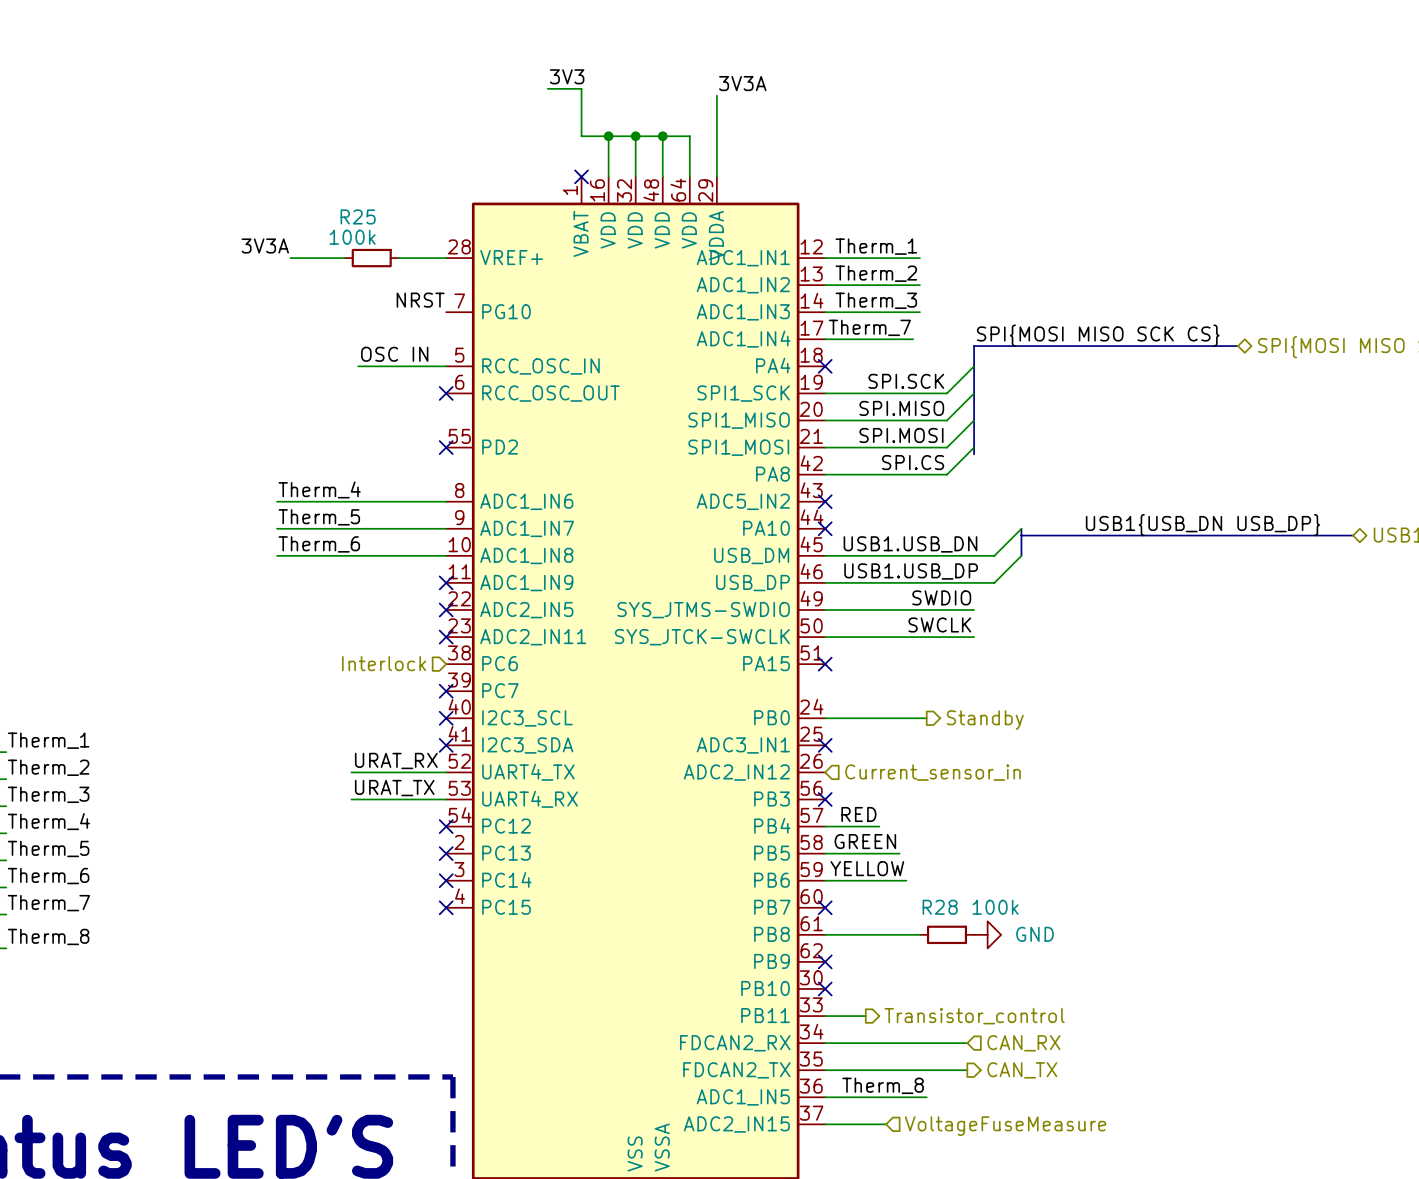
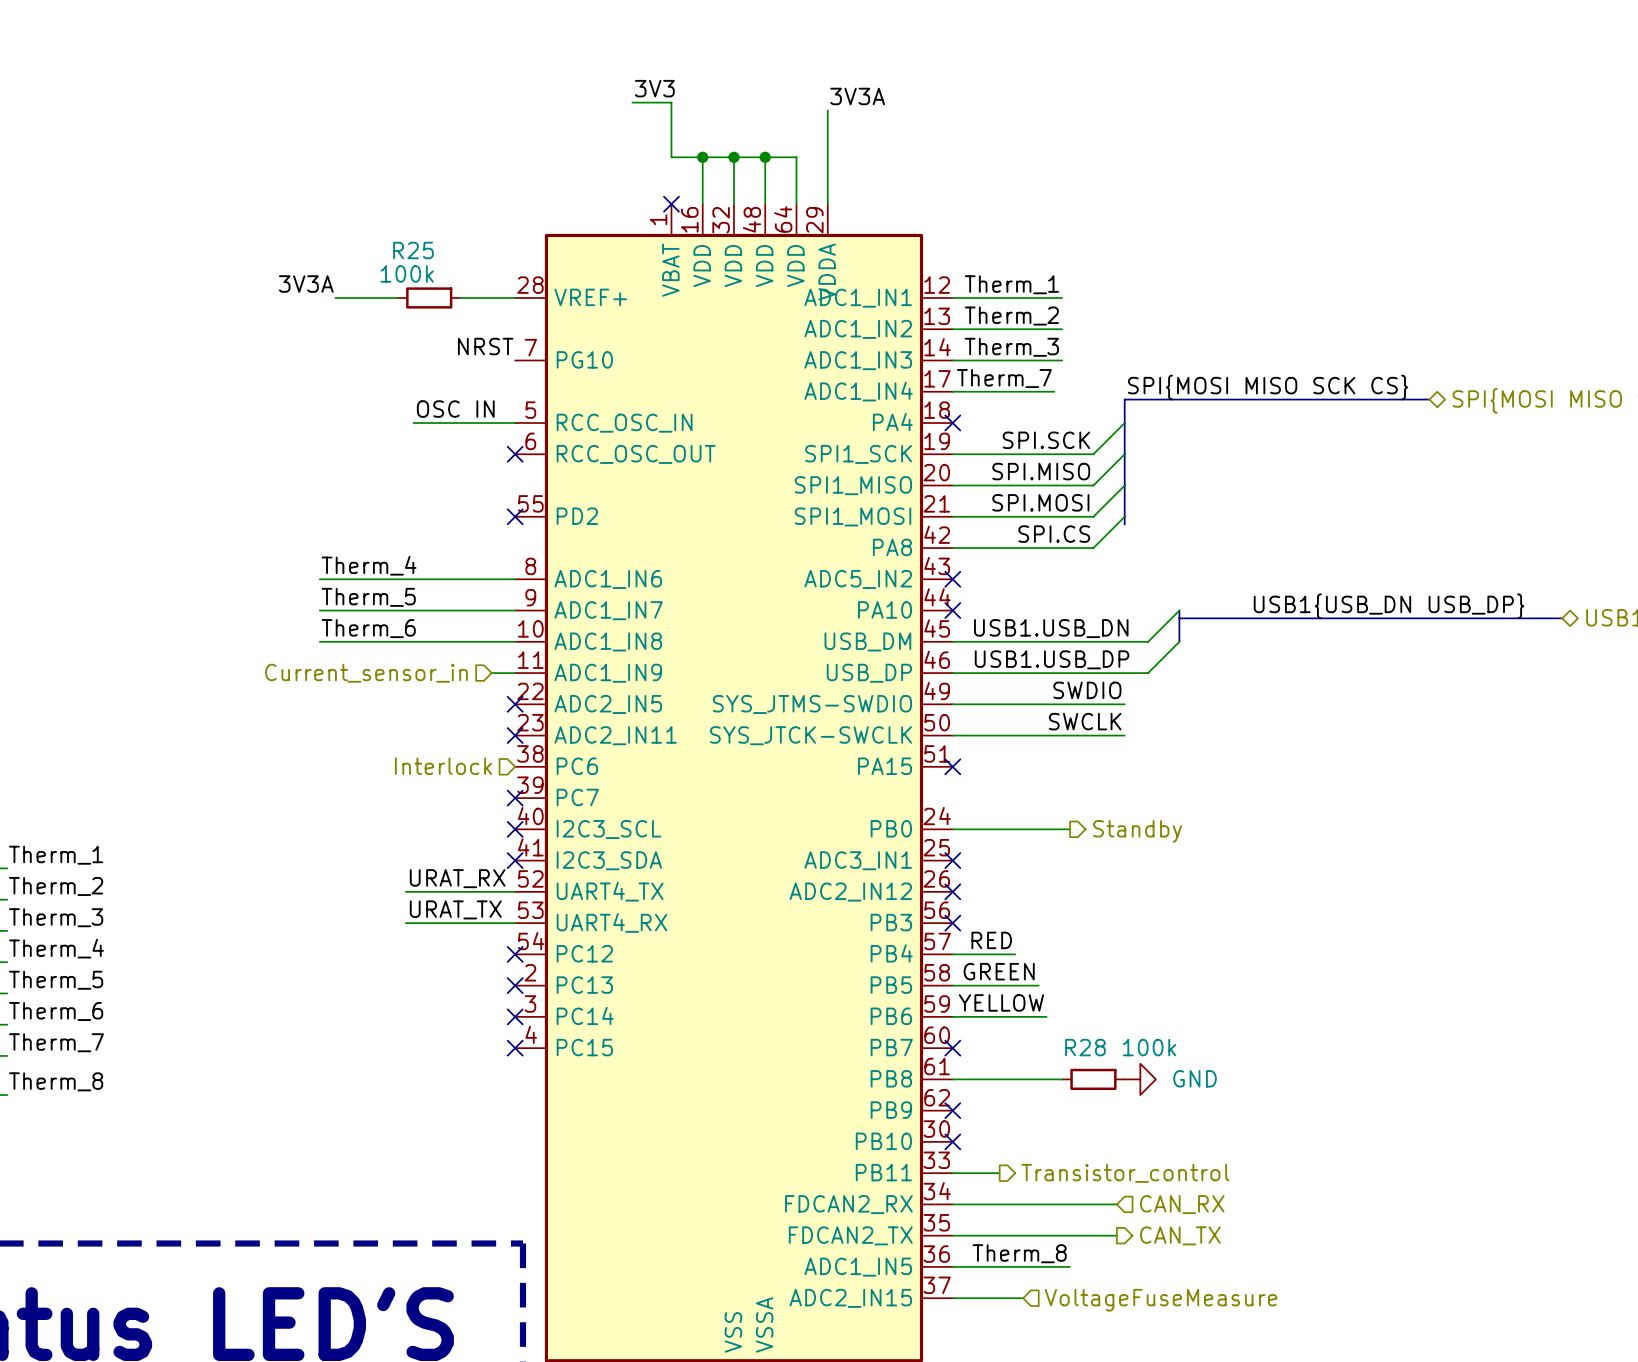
wire: none -> (491, 673) (515, 673)
no-connect mark: (446, 582) -> none
hierarchical label: none -> Current_sensor_in (366, 673)
no-connect mark: none -> (952, 891)
hierarchical label: Current_sensor_in (933, 772) -> none

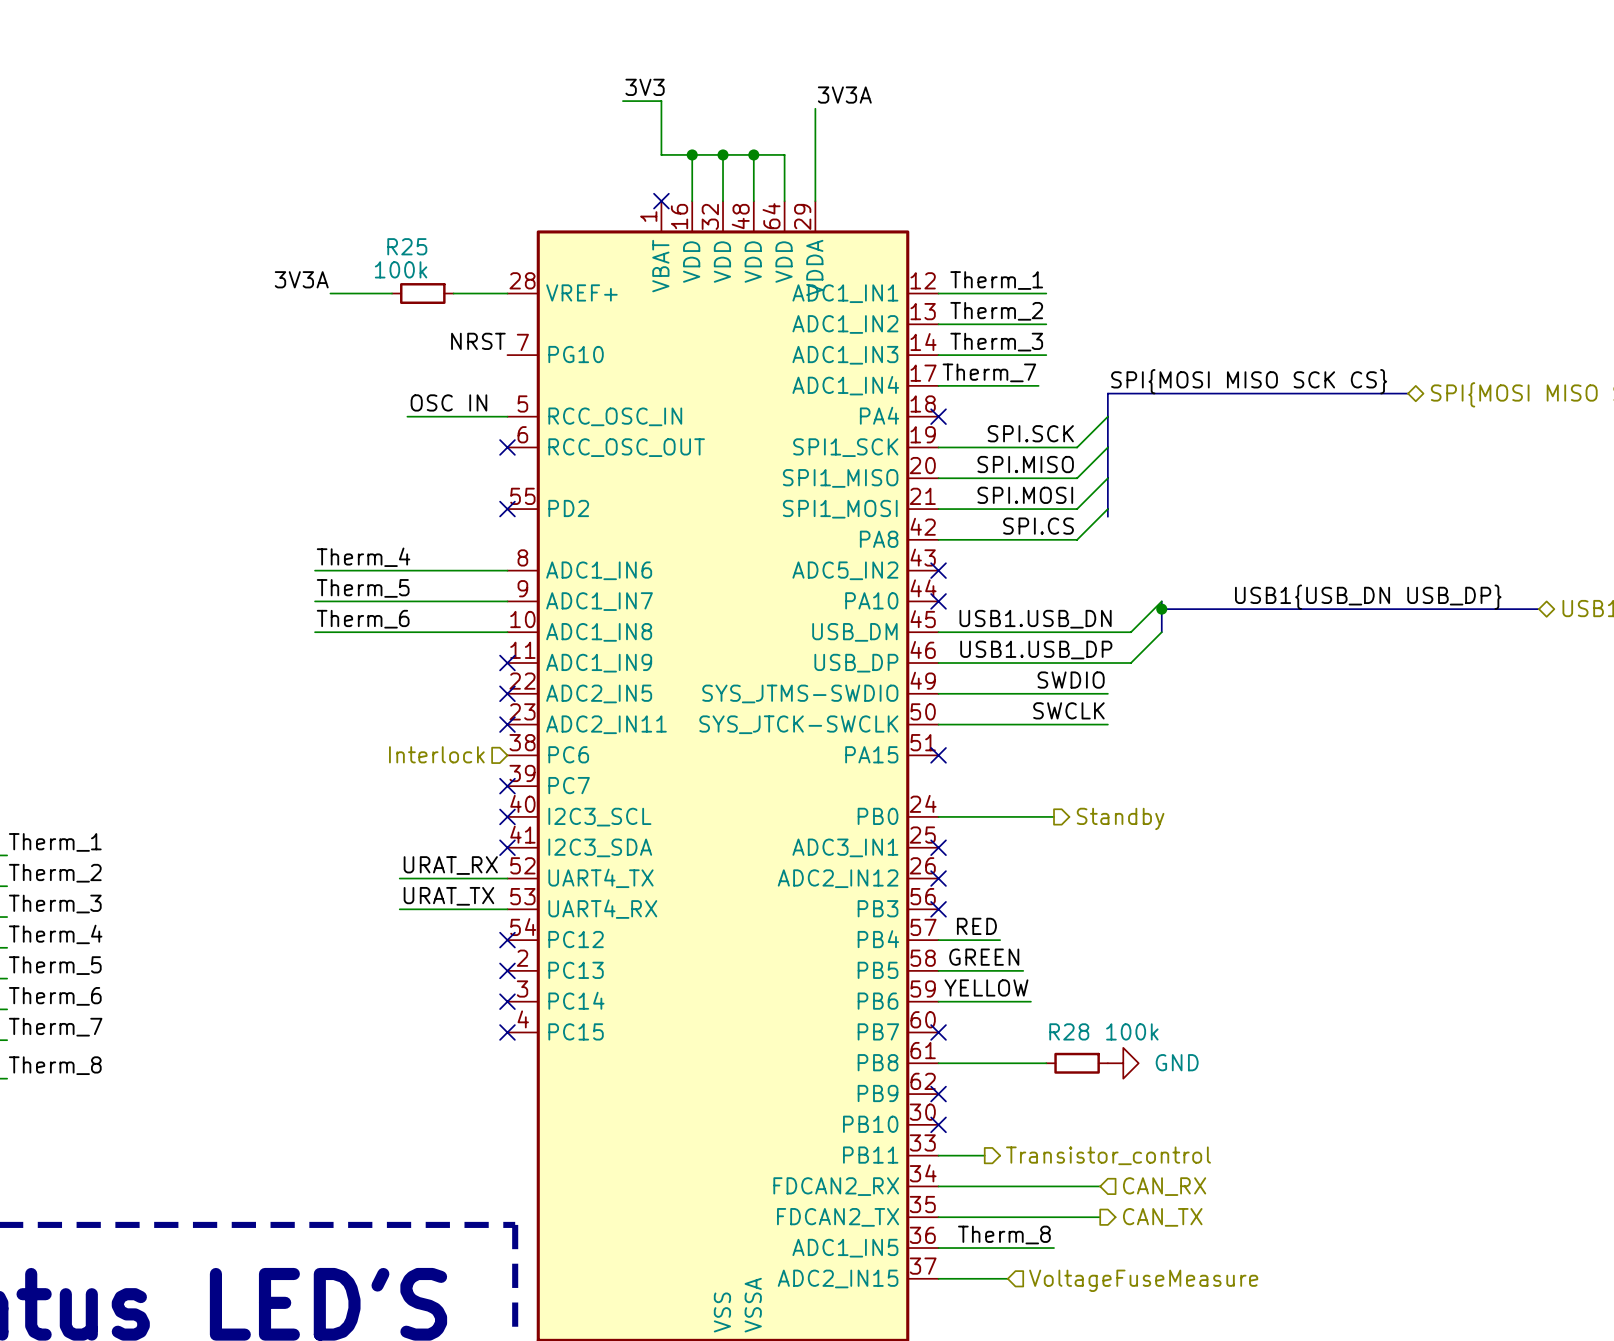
junction: none -> (1161, 609)
hierarchical label: Current_sensor_in (366, 673) -> none
wire: (491, 673) (515, 673) -> none
no-connect mark: none -> (507, 663)

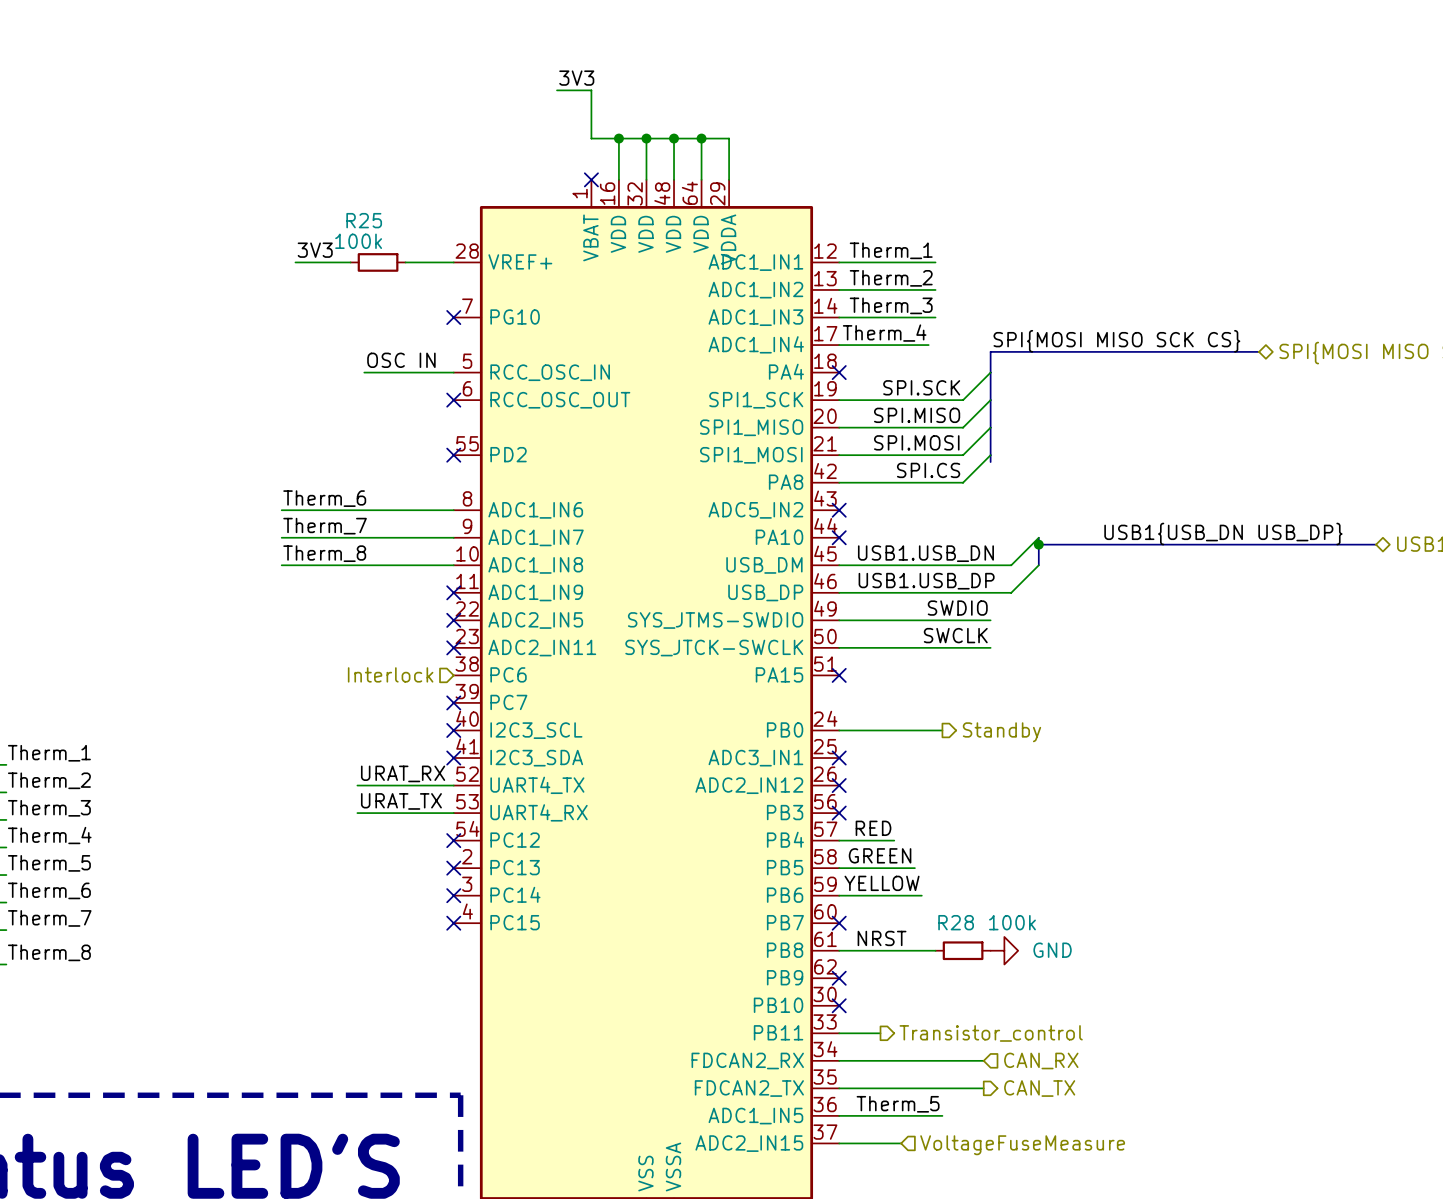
label: 3V3A (844, 95) -> none
wire: (815, 108) (815, 154) -> (701, 138) (729, 138)
junction: none -> (701, 138)
label: 3V3A (301, 279) -> 3V3 (315, 250)
label: NRST (478, 341) -> none
no-connect mark: none -> (453, 317)
label: Therm_7 (989, 372) -> Therm_4 (884, 333)
label: Therm_4 (363, 557) -> Therm_6 (324, 498)
label: Therm_5 (363, 588) -> Therm_7 (325, 526)
label: Therm_6 (363, 619) -> Therm_8 (324, 553)
label: none -> NRST (882, 938)
label: Therm_8 (1004, 1235) -> Therm_5 (898, 1104)

